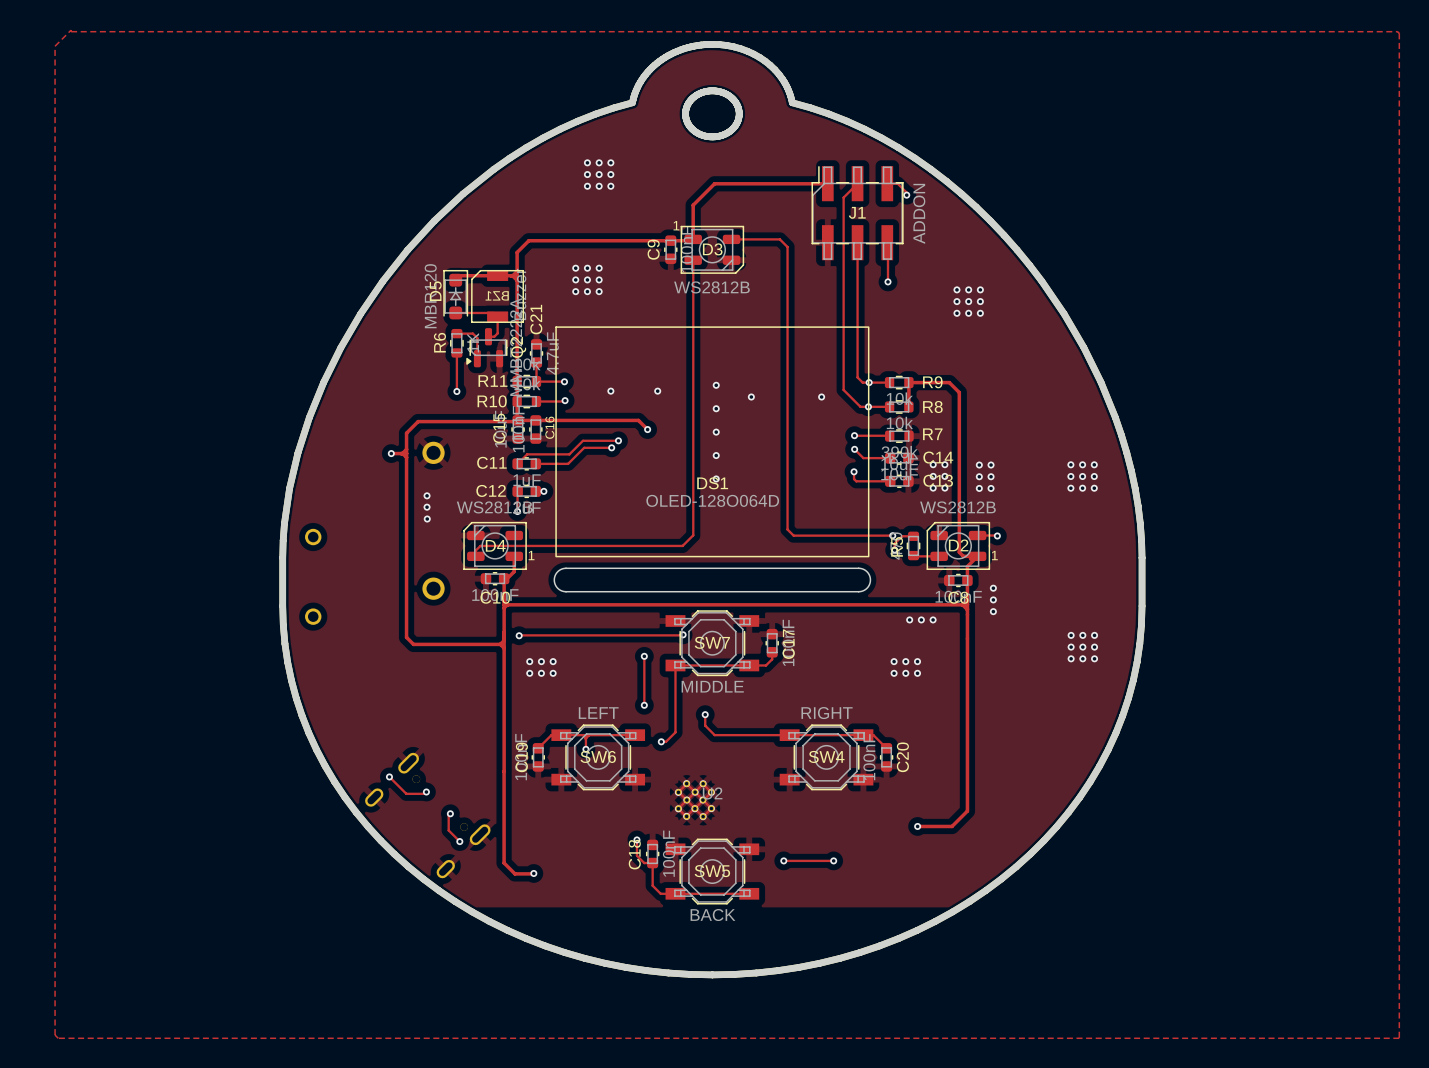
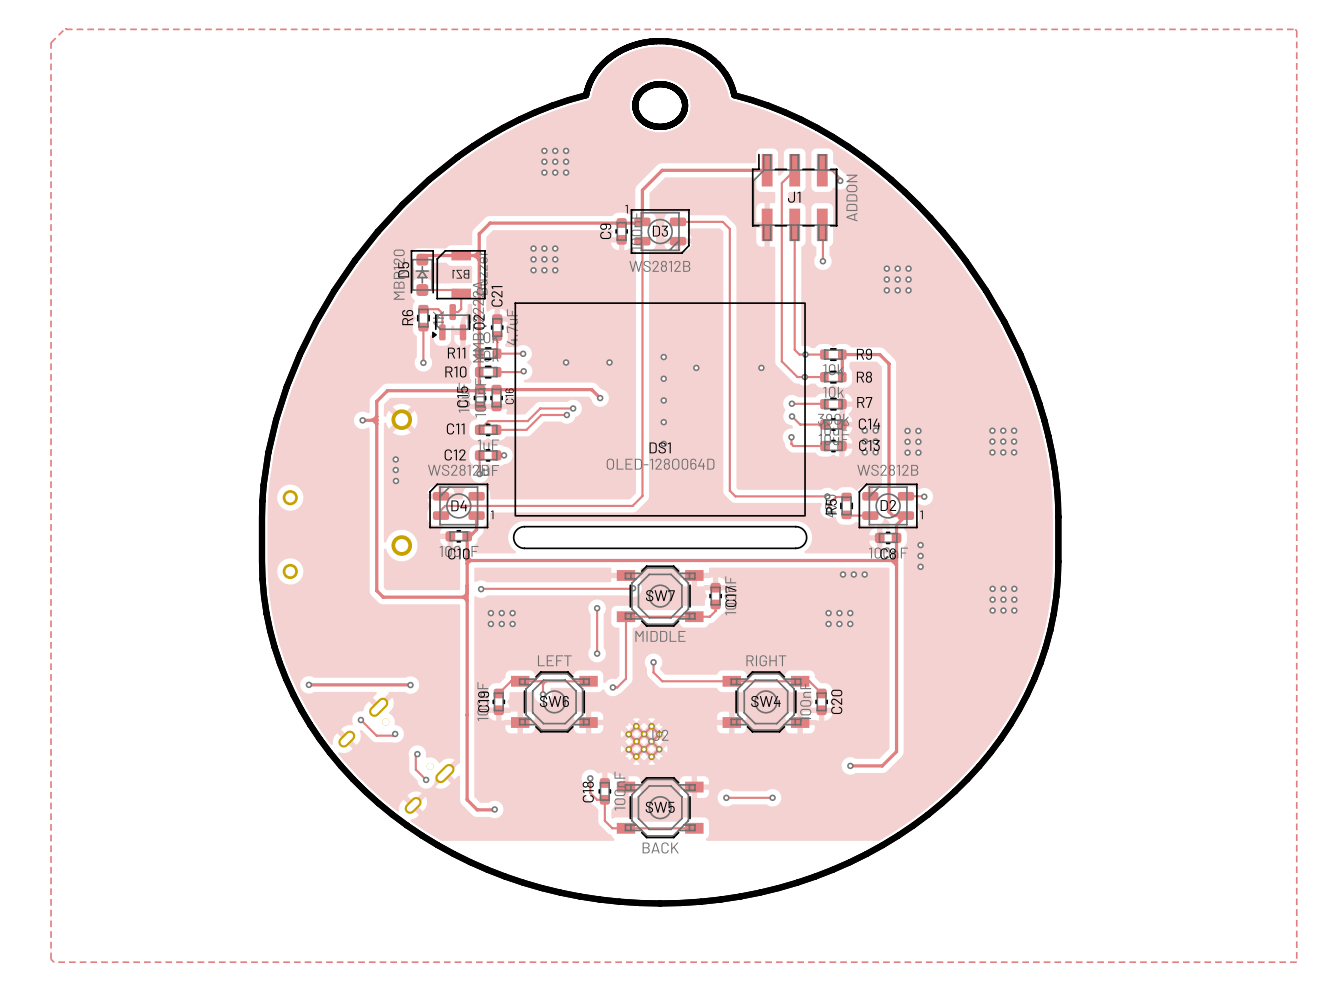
track: none -> (308, 684) (410, 685)
via: none -> (308, 684)
via: none -> (410, 685)

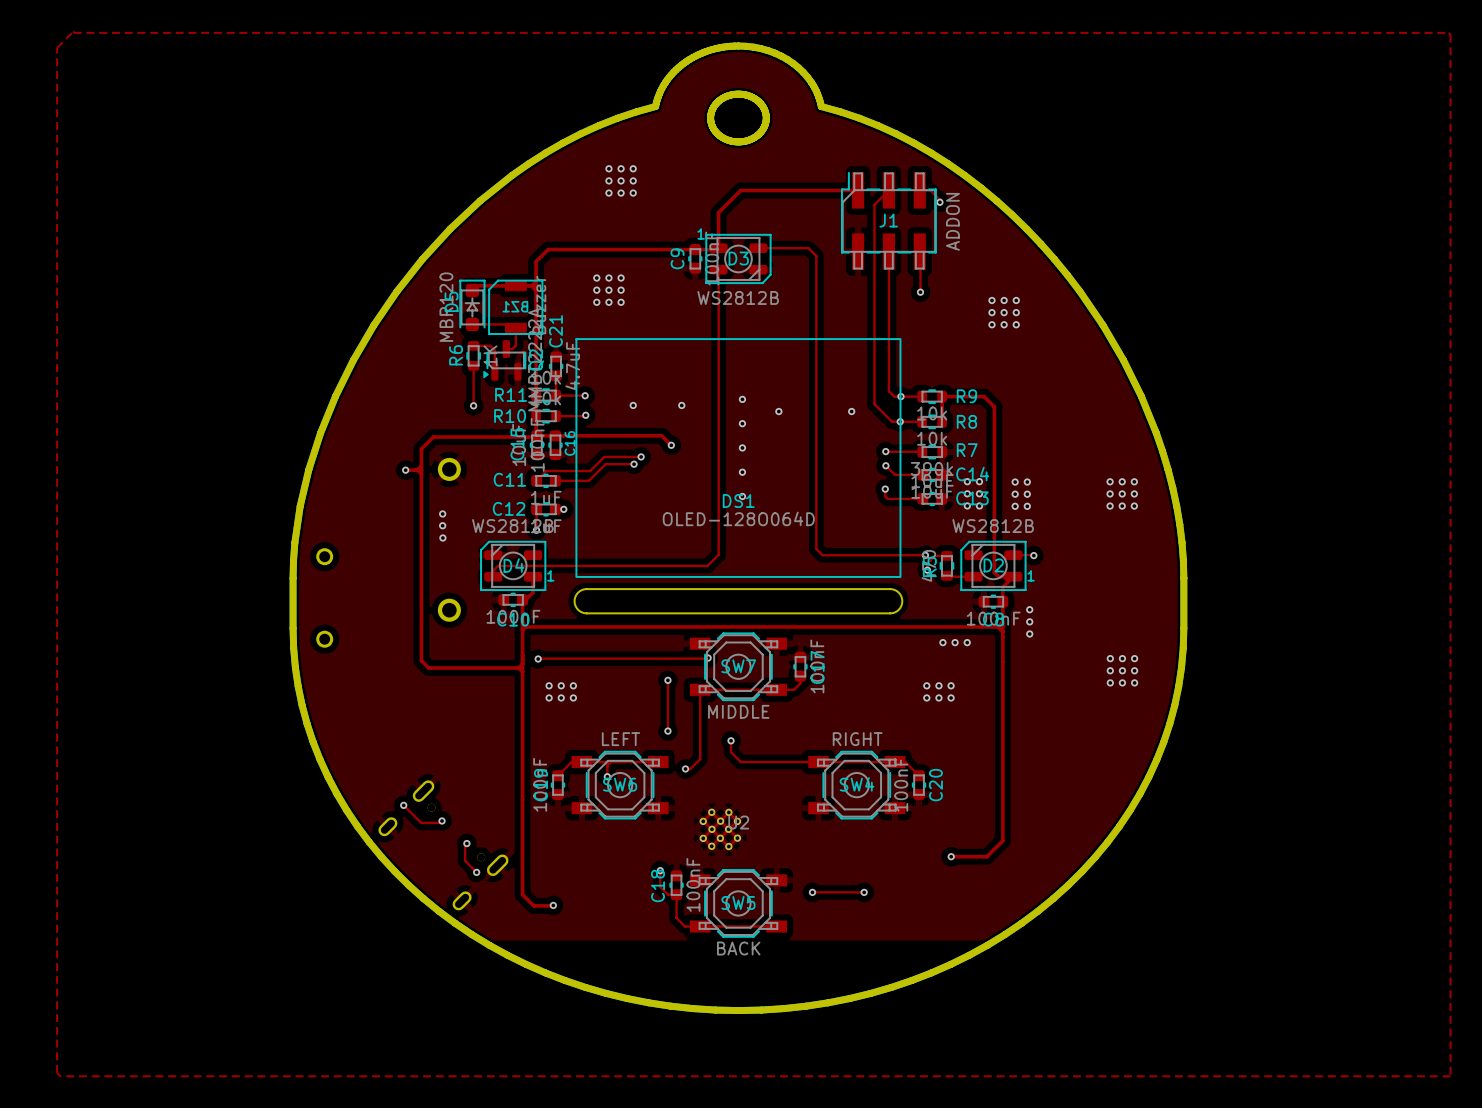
track: (308, 684) (410, 685) -> none
via: (308, 684) -> none
via: (410, 685) -> none

